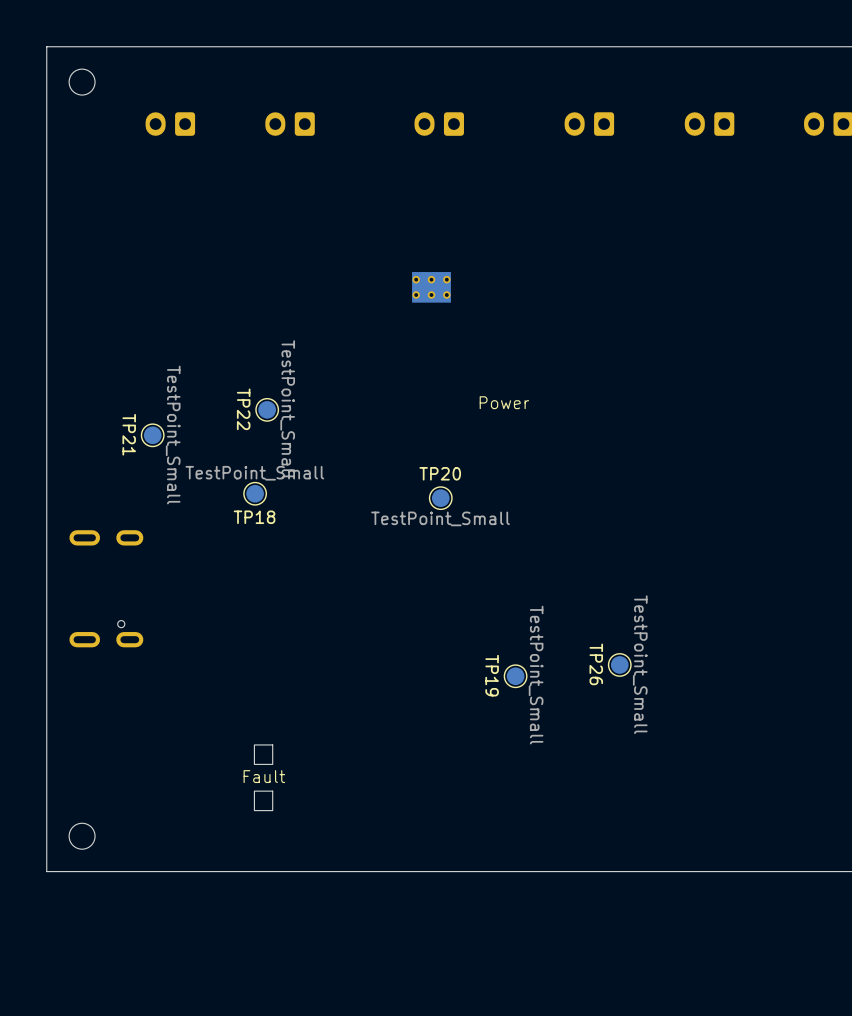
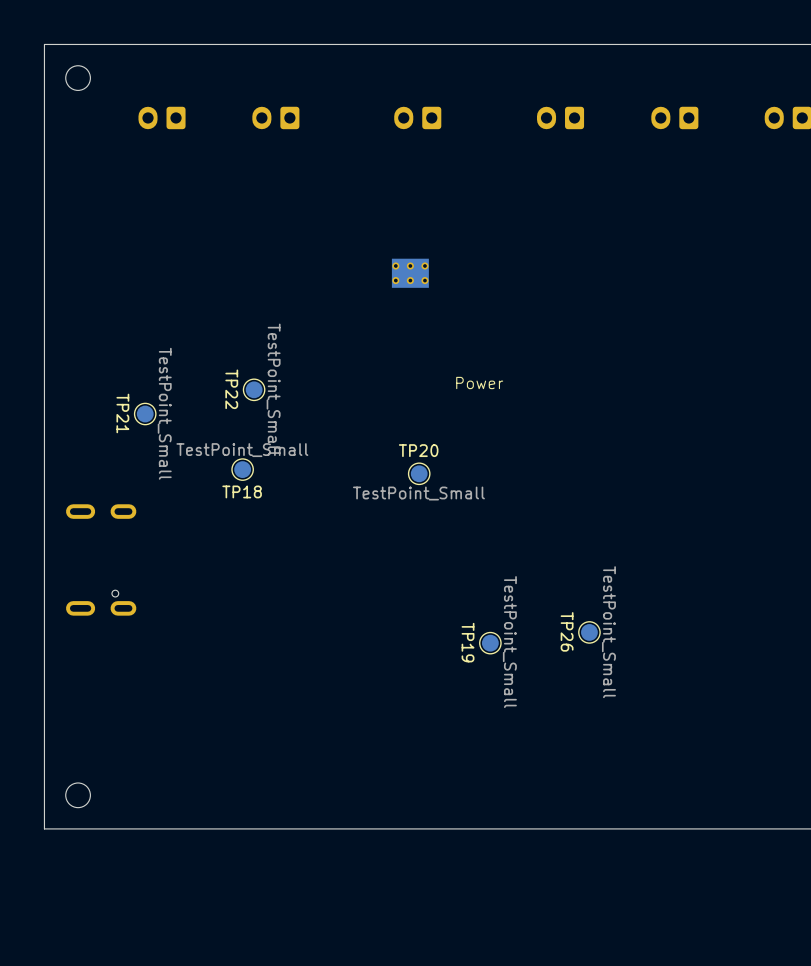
part: (263, 754) -> none
text: Fault (264, 776) -> none
part: (263, 800) -> none

